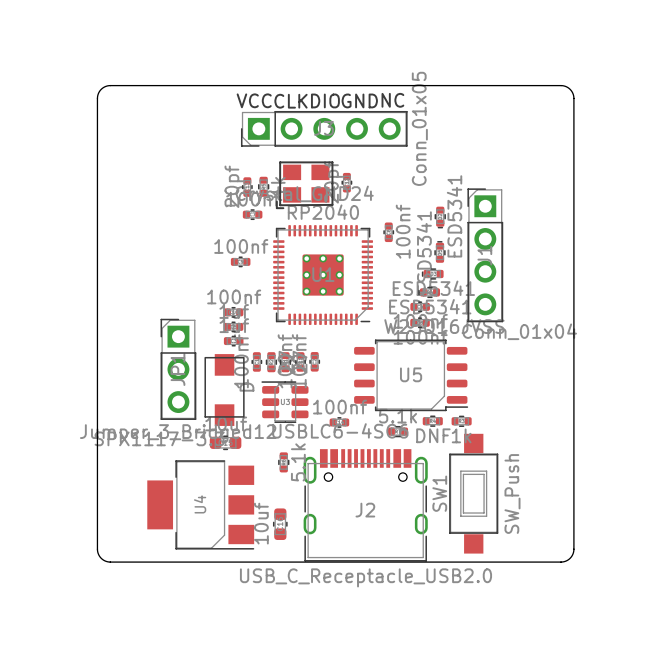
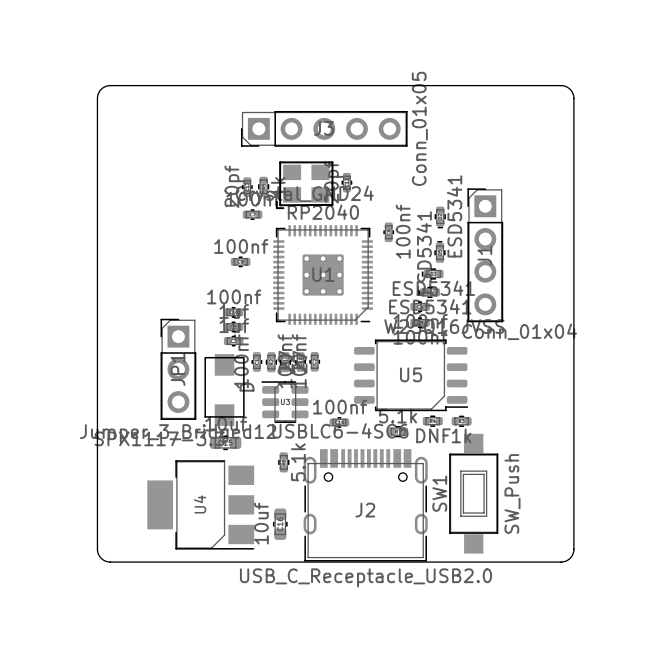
text: VCC (254, 100) -> none
text: DIO (325, 100) -> none
text: GND (359, 100) -> none
text: NC (392, 100) -> none
text: CLK (290, 101) -> none

